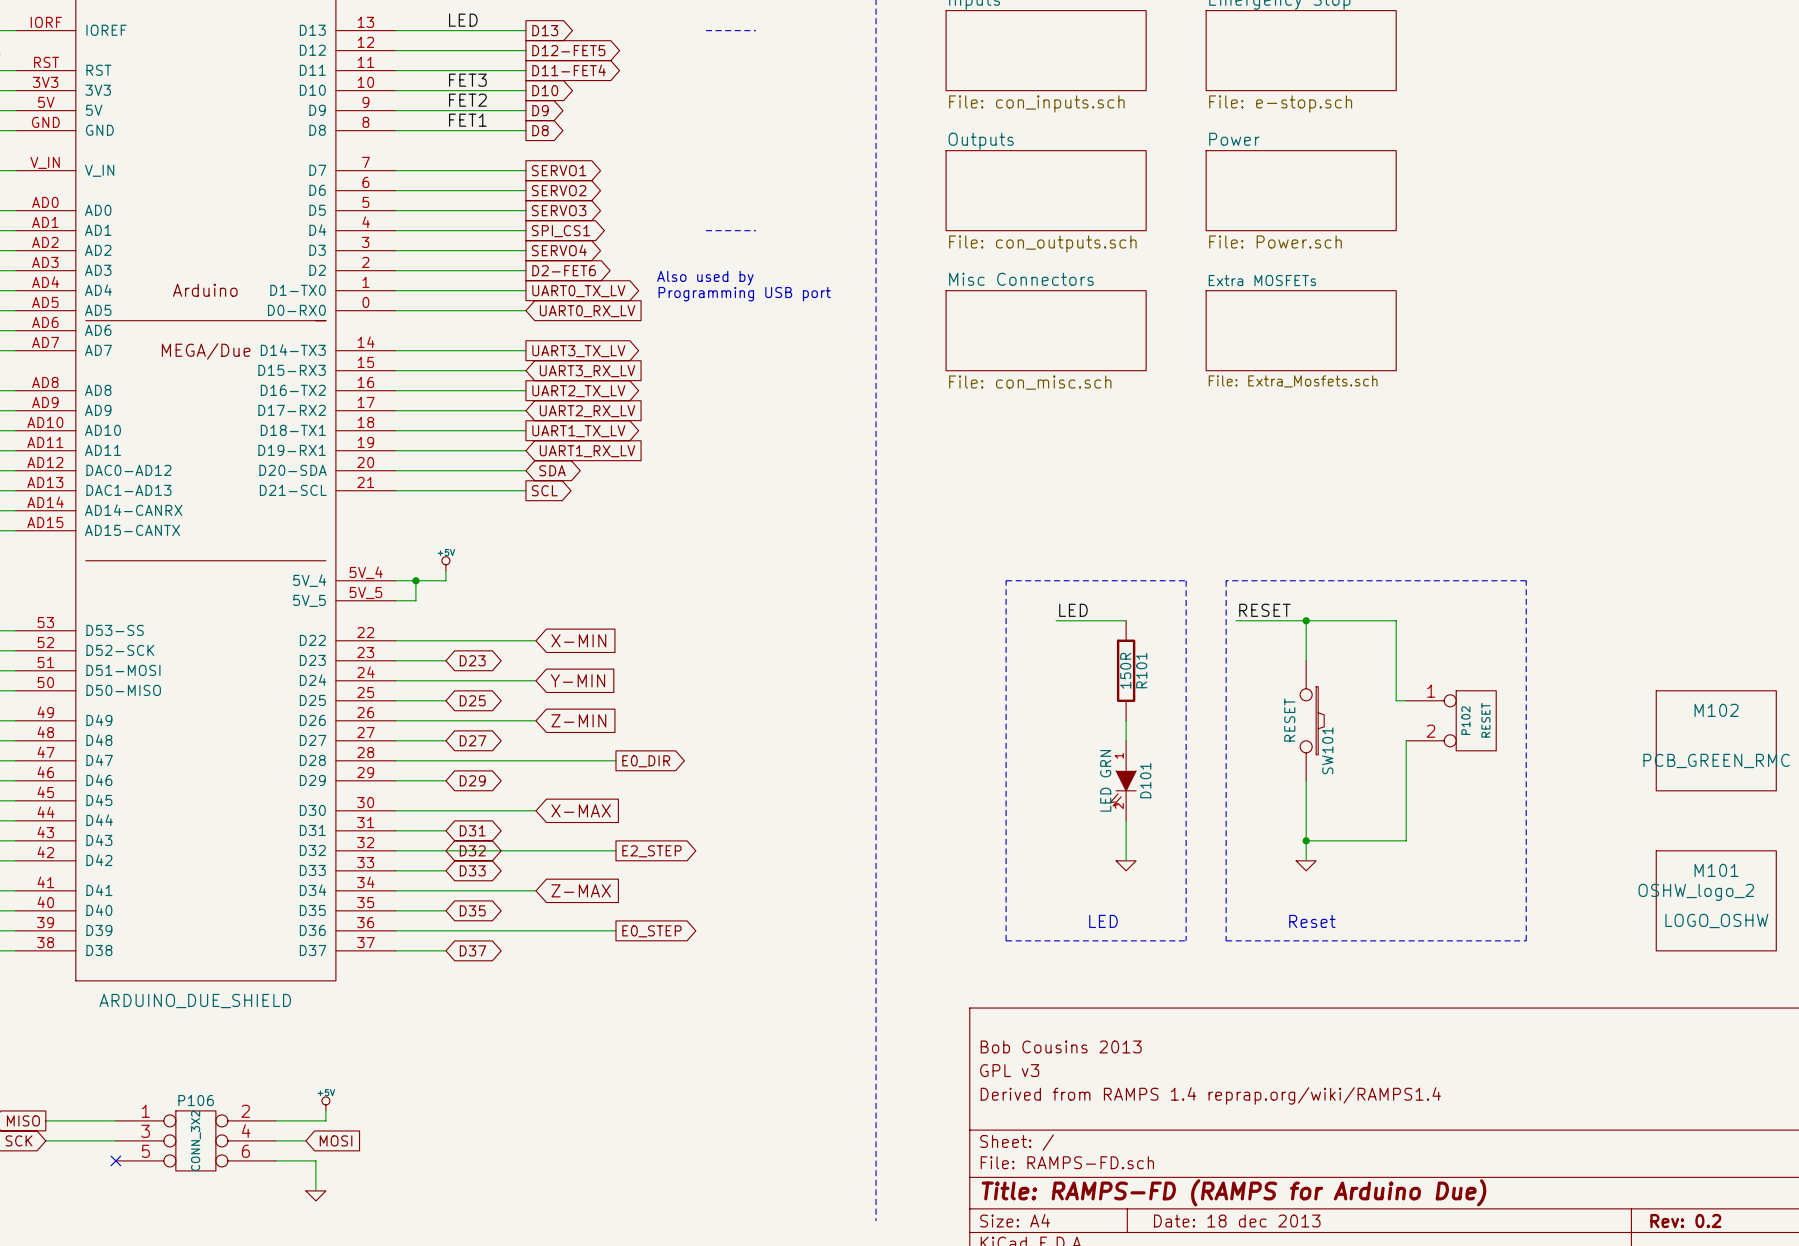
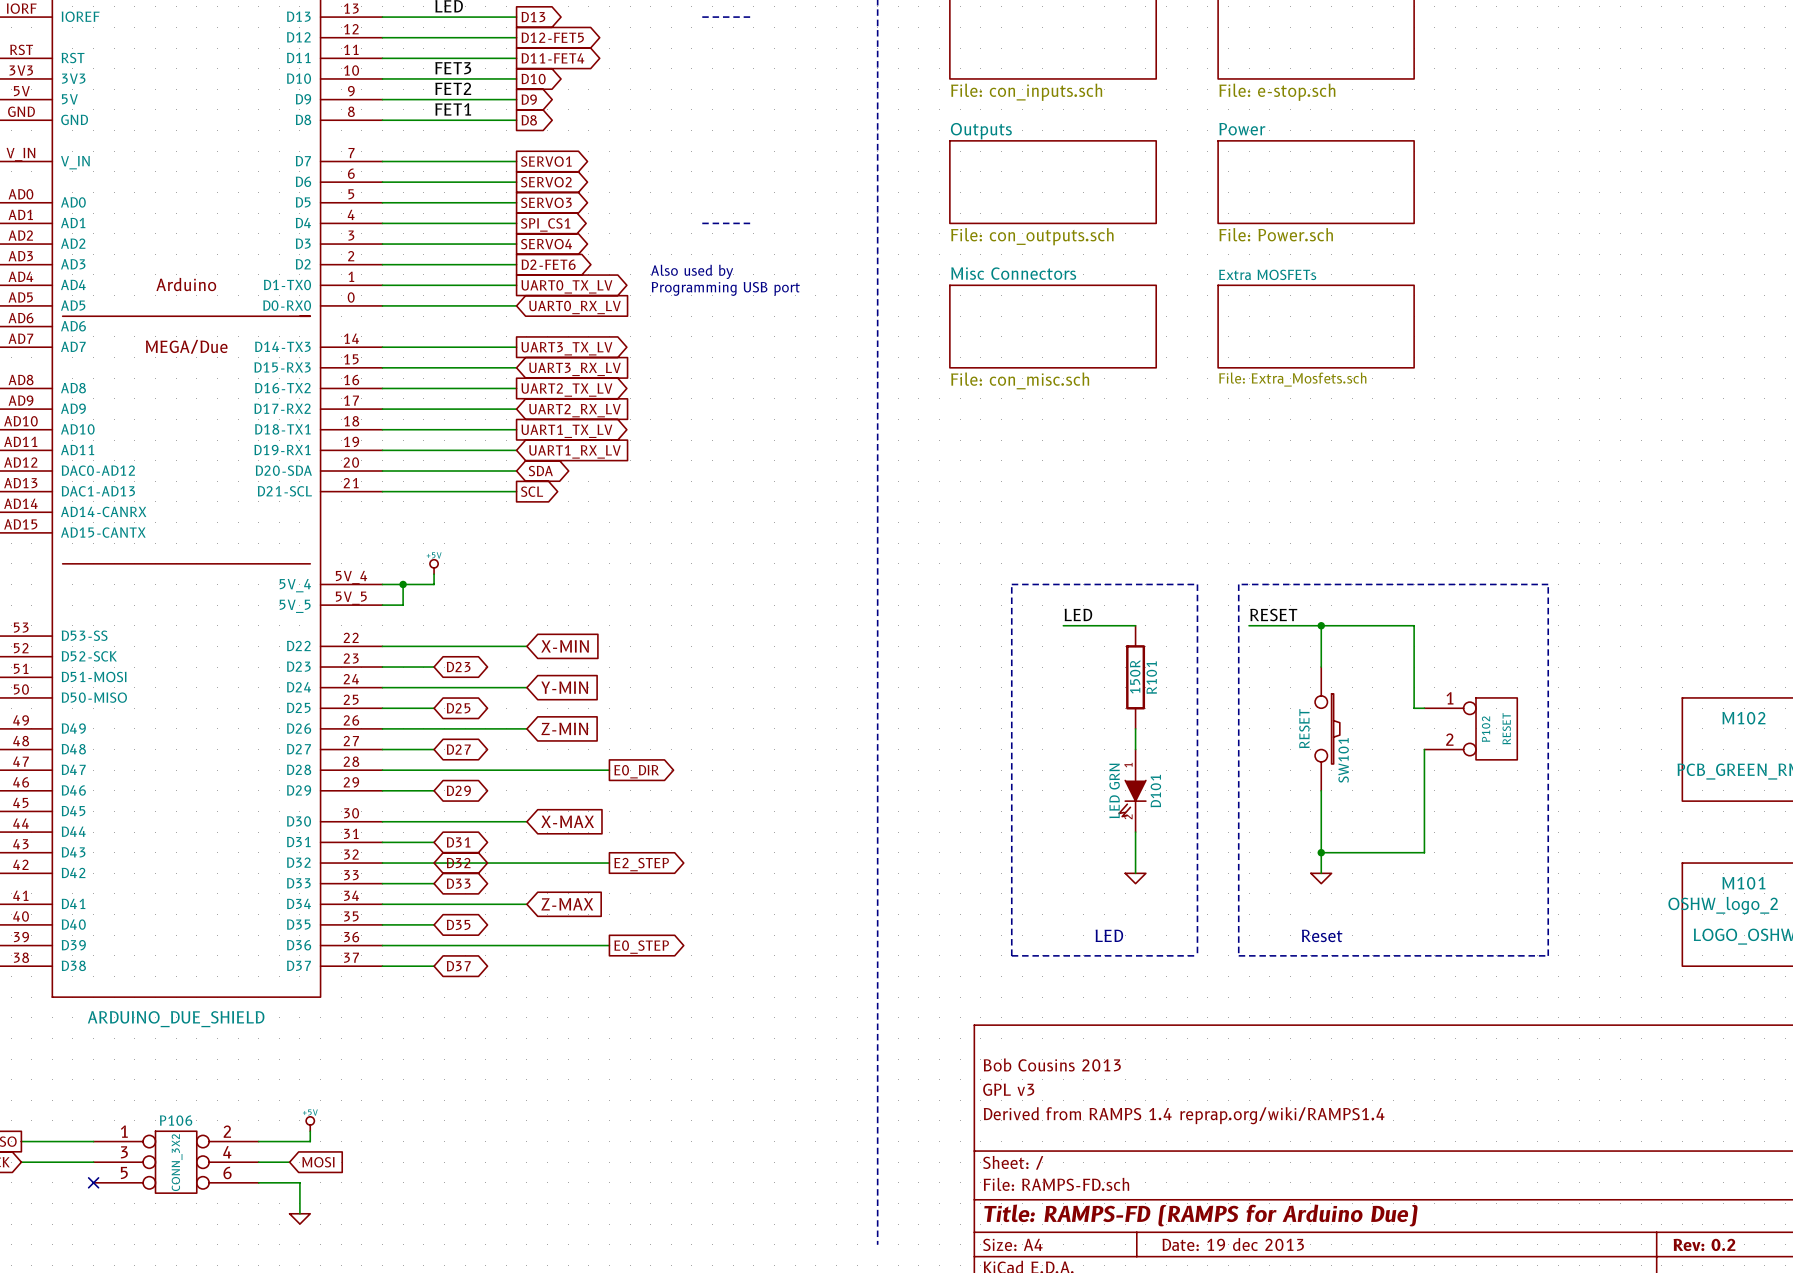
title block: Date: 18 dec 2013 (1237, 1221) -> Date: 19 dec 2013 (1233, 1244)

